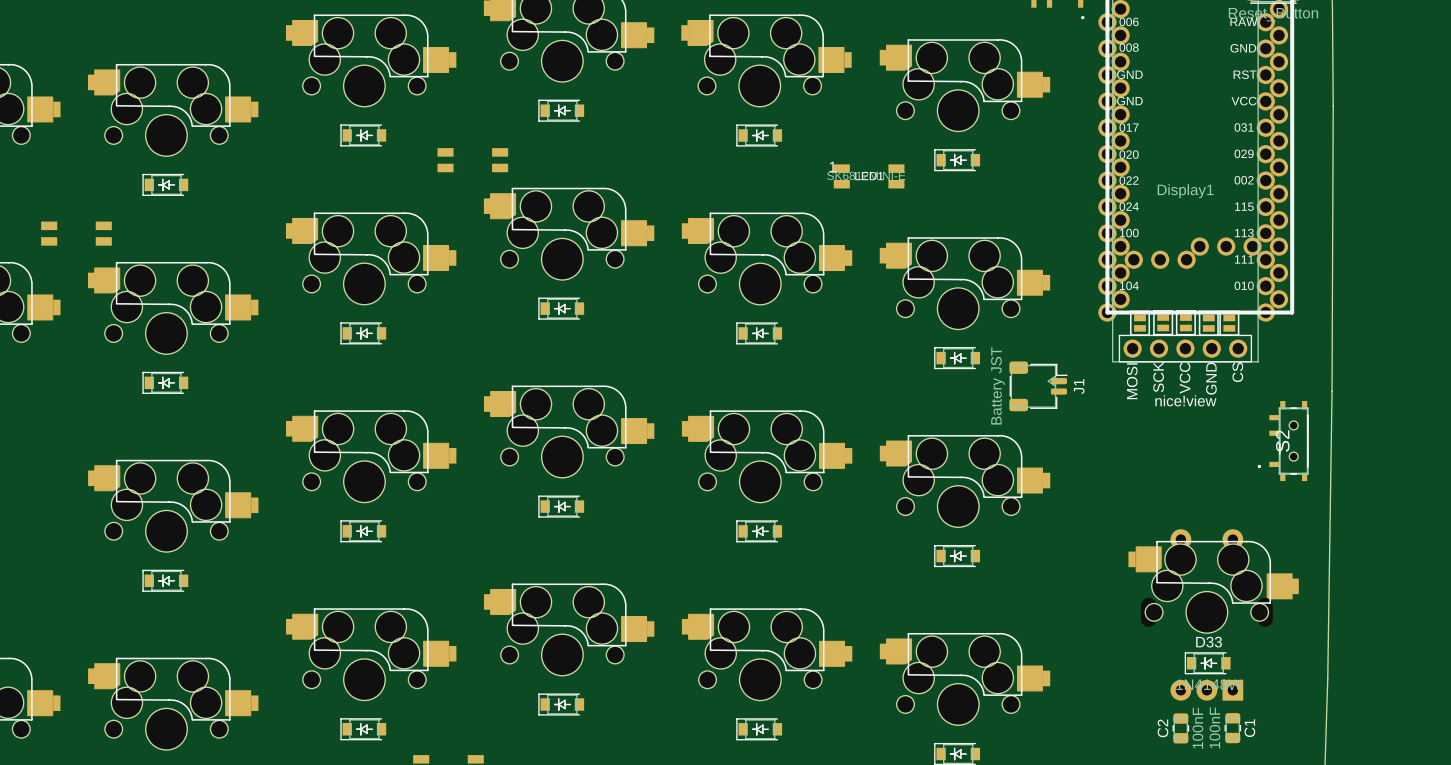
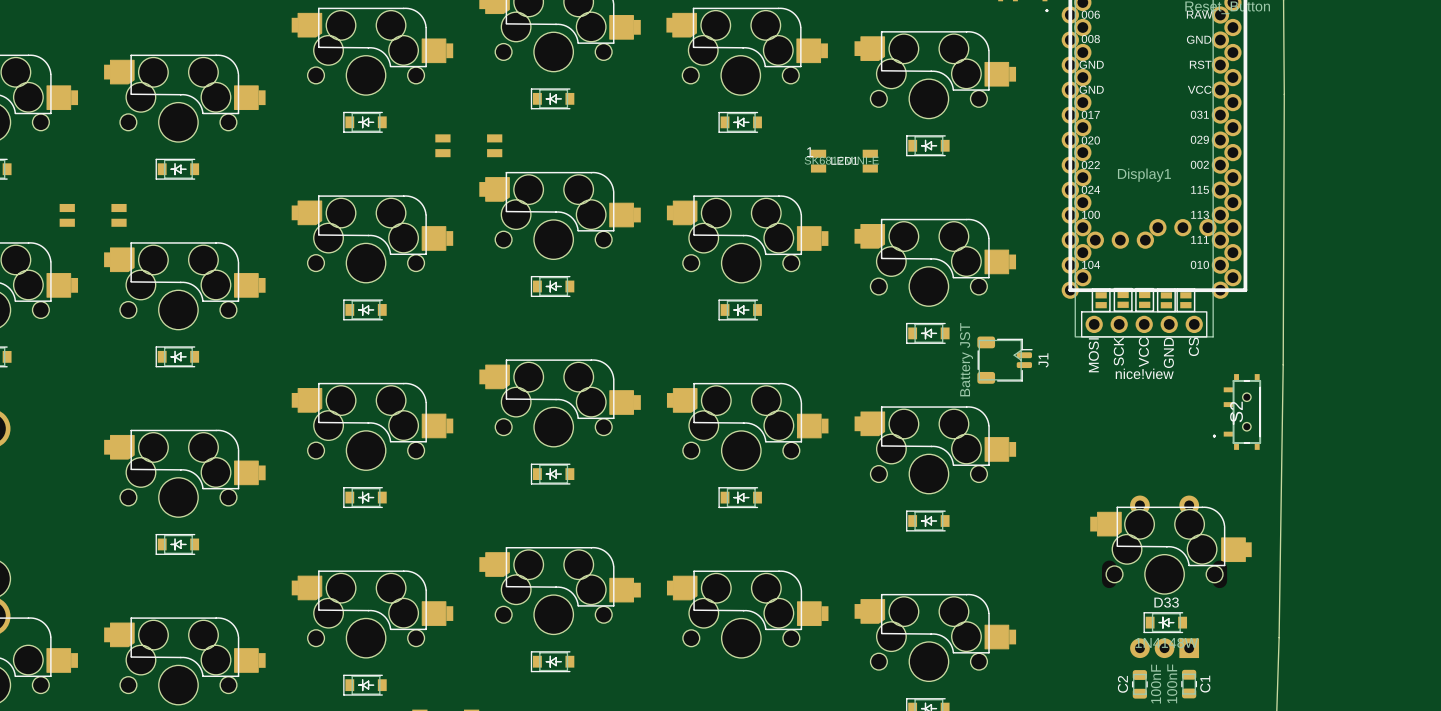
part: (759, 729) -> none

